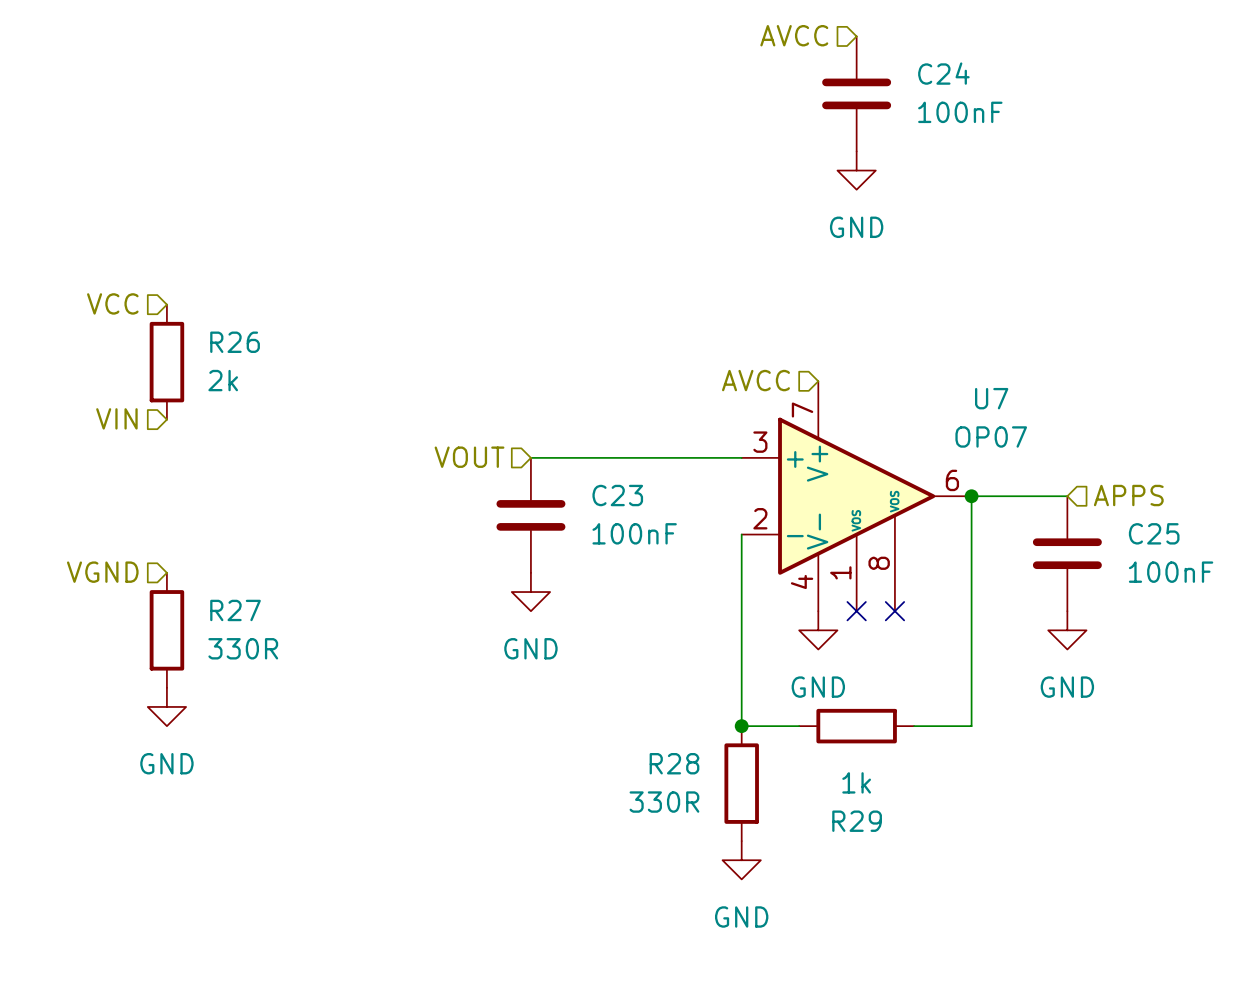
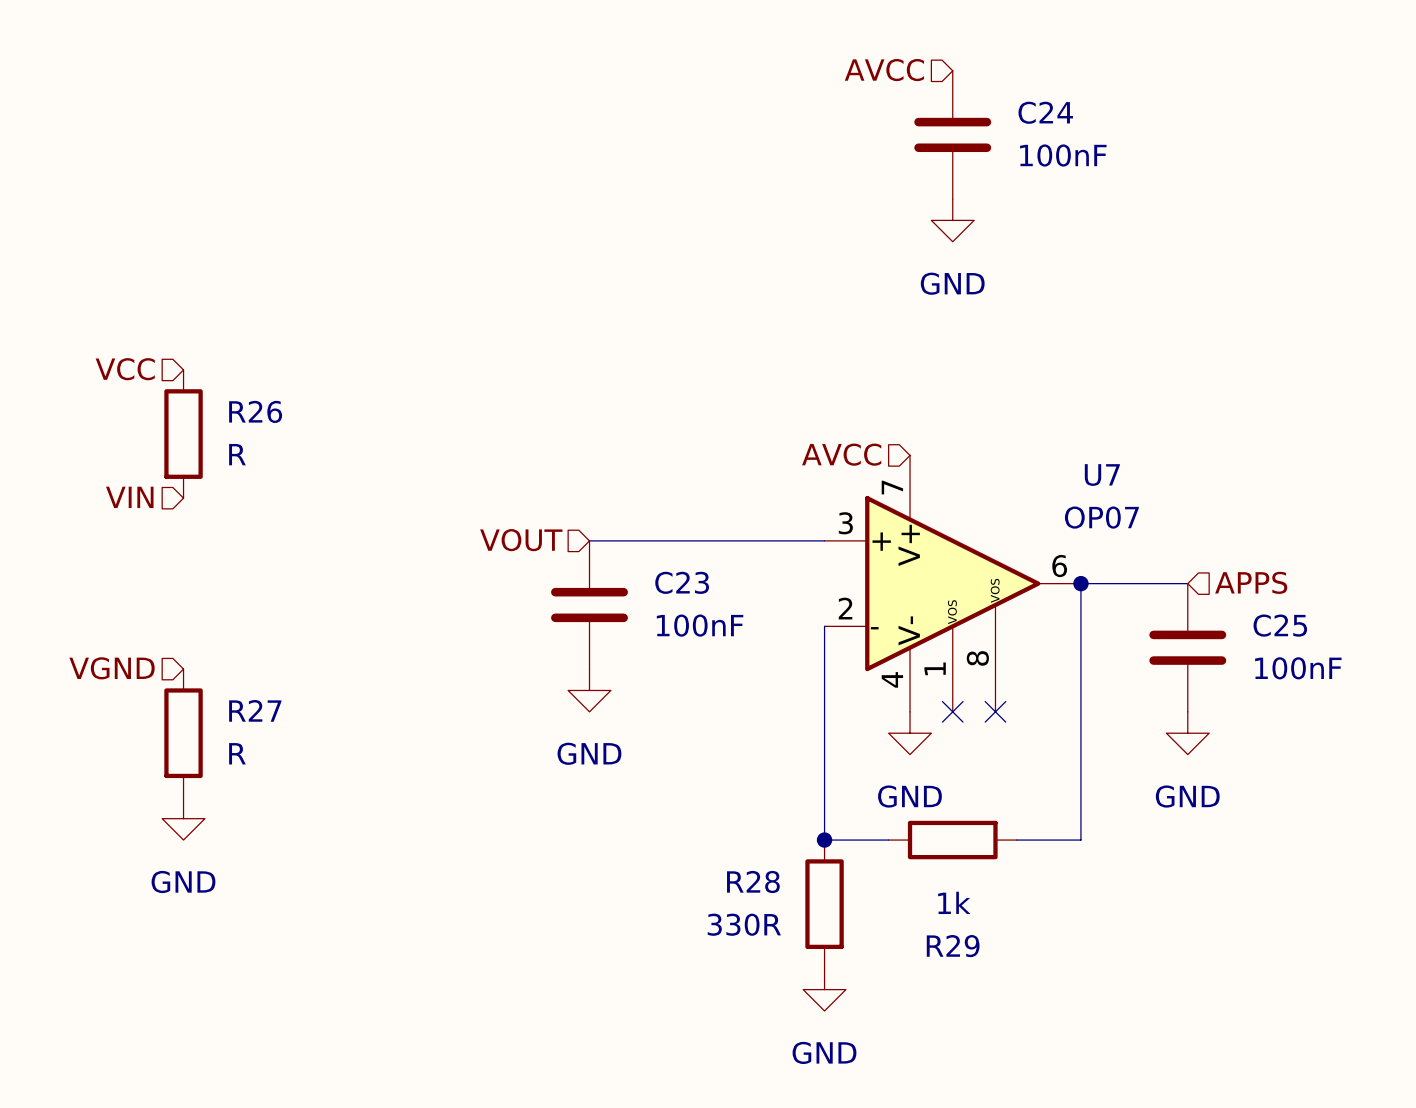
R26 value: 2k (223, 380) -> R (237, 454)
R27 value: 330R (243, 648) -> R (237, 753)

